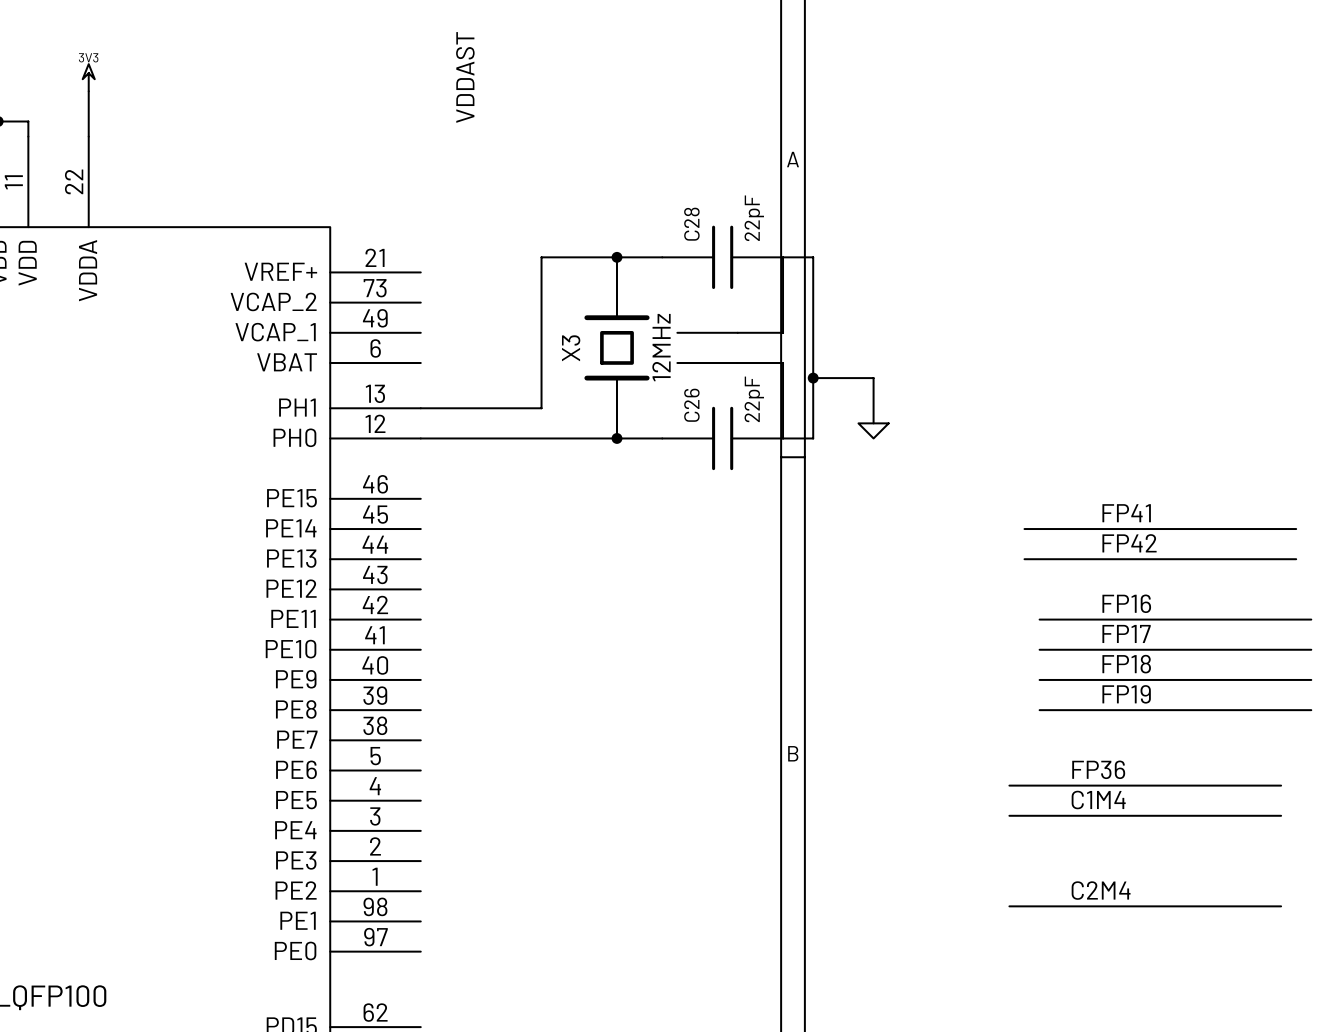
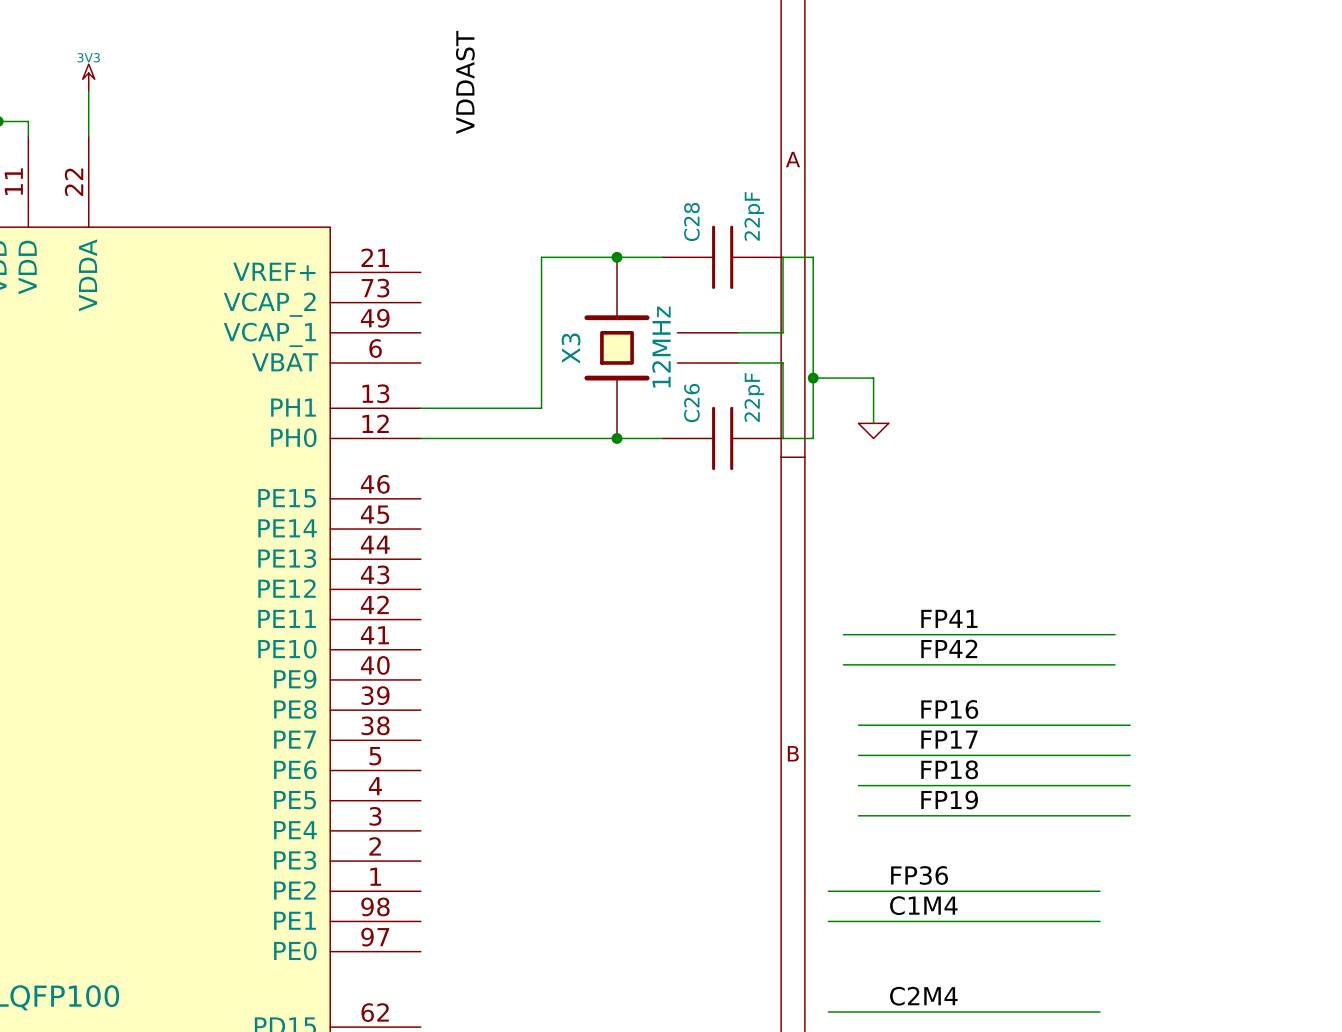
label position: FP41 (1126, 513) -> FP41 (949, 618)
wire: (1024, 529) (1296, 529) -> (843, 634) (1115, 634)
label position: FP42 (1129, 543) -> FP42 (949, 648)
wire: (1024, 559) (1296, 559) -> (843, 664) (1115, 664)
label position: FP16 (1126, 603) -> FP16 (949, 709)
wire: (1039, 619) (1311, 619) -> (858, 725) (1130, 725)
label position: FP17 (1126, 633) -> FP17 (949, 739)
wire: (1039, 649) (1311, 649) -> (858, 755) (1130, 755)
label position: FP18 (1126, 664) -> FP18 (949, 769)
wire: (1039, 679) (1311, 679) -> none
label position: FP19 (1126, 694) -> FP19 (949, 800)
wire: (1039, 710) (1311, 710) -> (828, 891) (1099, 891)
label position: FP36 (1098, 769) -> FP36 (919, 875)
wire: (1130, 785) (1281, 785) -> (858, 785) (1009, 785)
label position: C1M4 (1098, 800) -> C1M4 (923, 905)
wire: (1130, 815) (1281, 815) -> (858, 815) (1009, 815)
label position: C2M4 (1101, 890) -> C2M4 (923, 996)
wire: (1009, 906) (1281, 906) -> (828, 1012) (1099, 1012)
wire: none -> (828, 921) (1099, 921)

